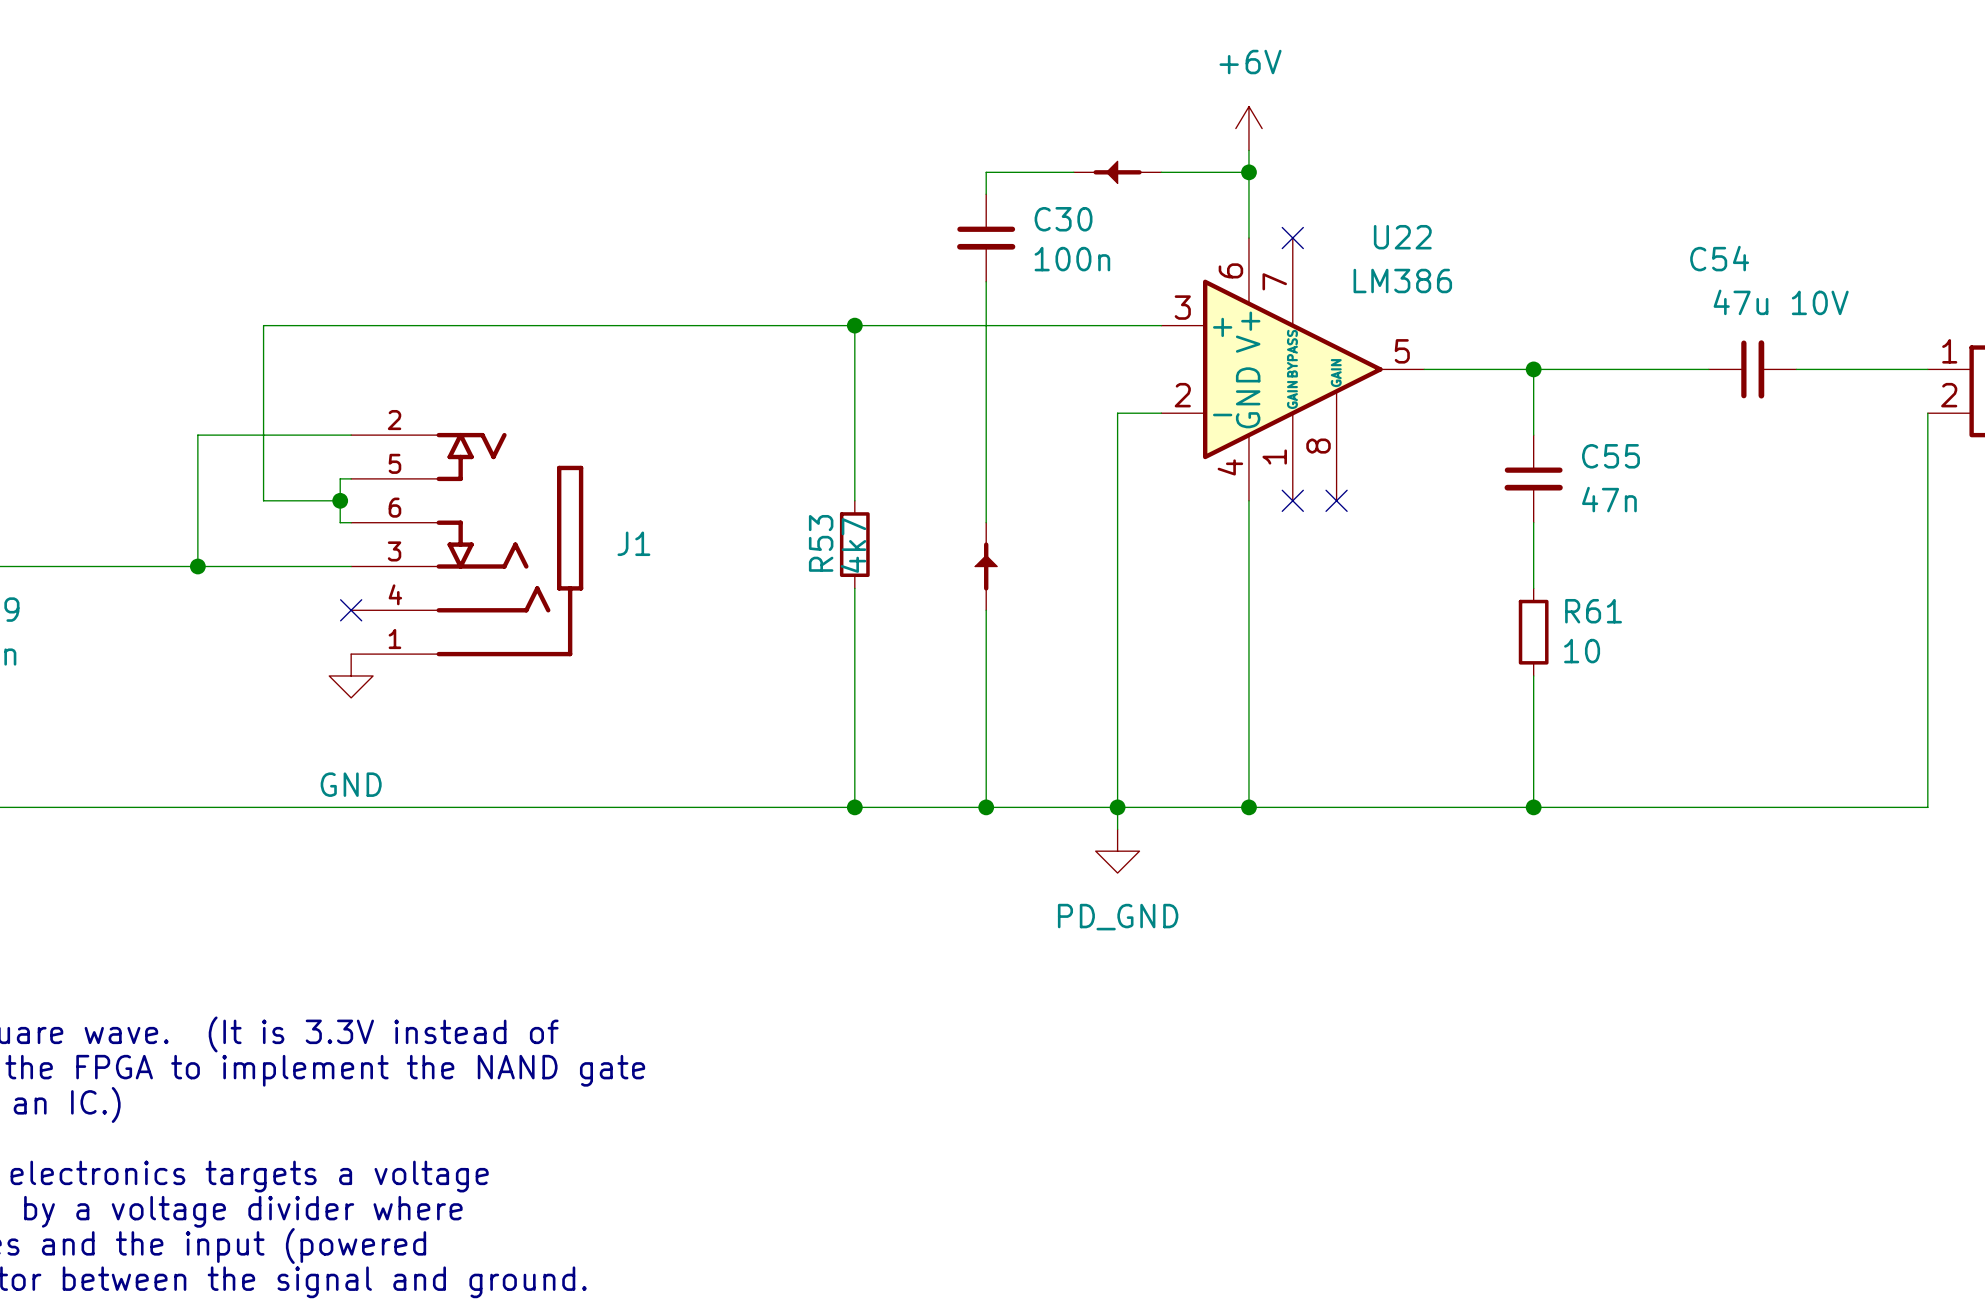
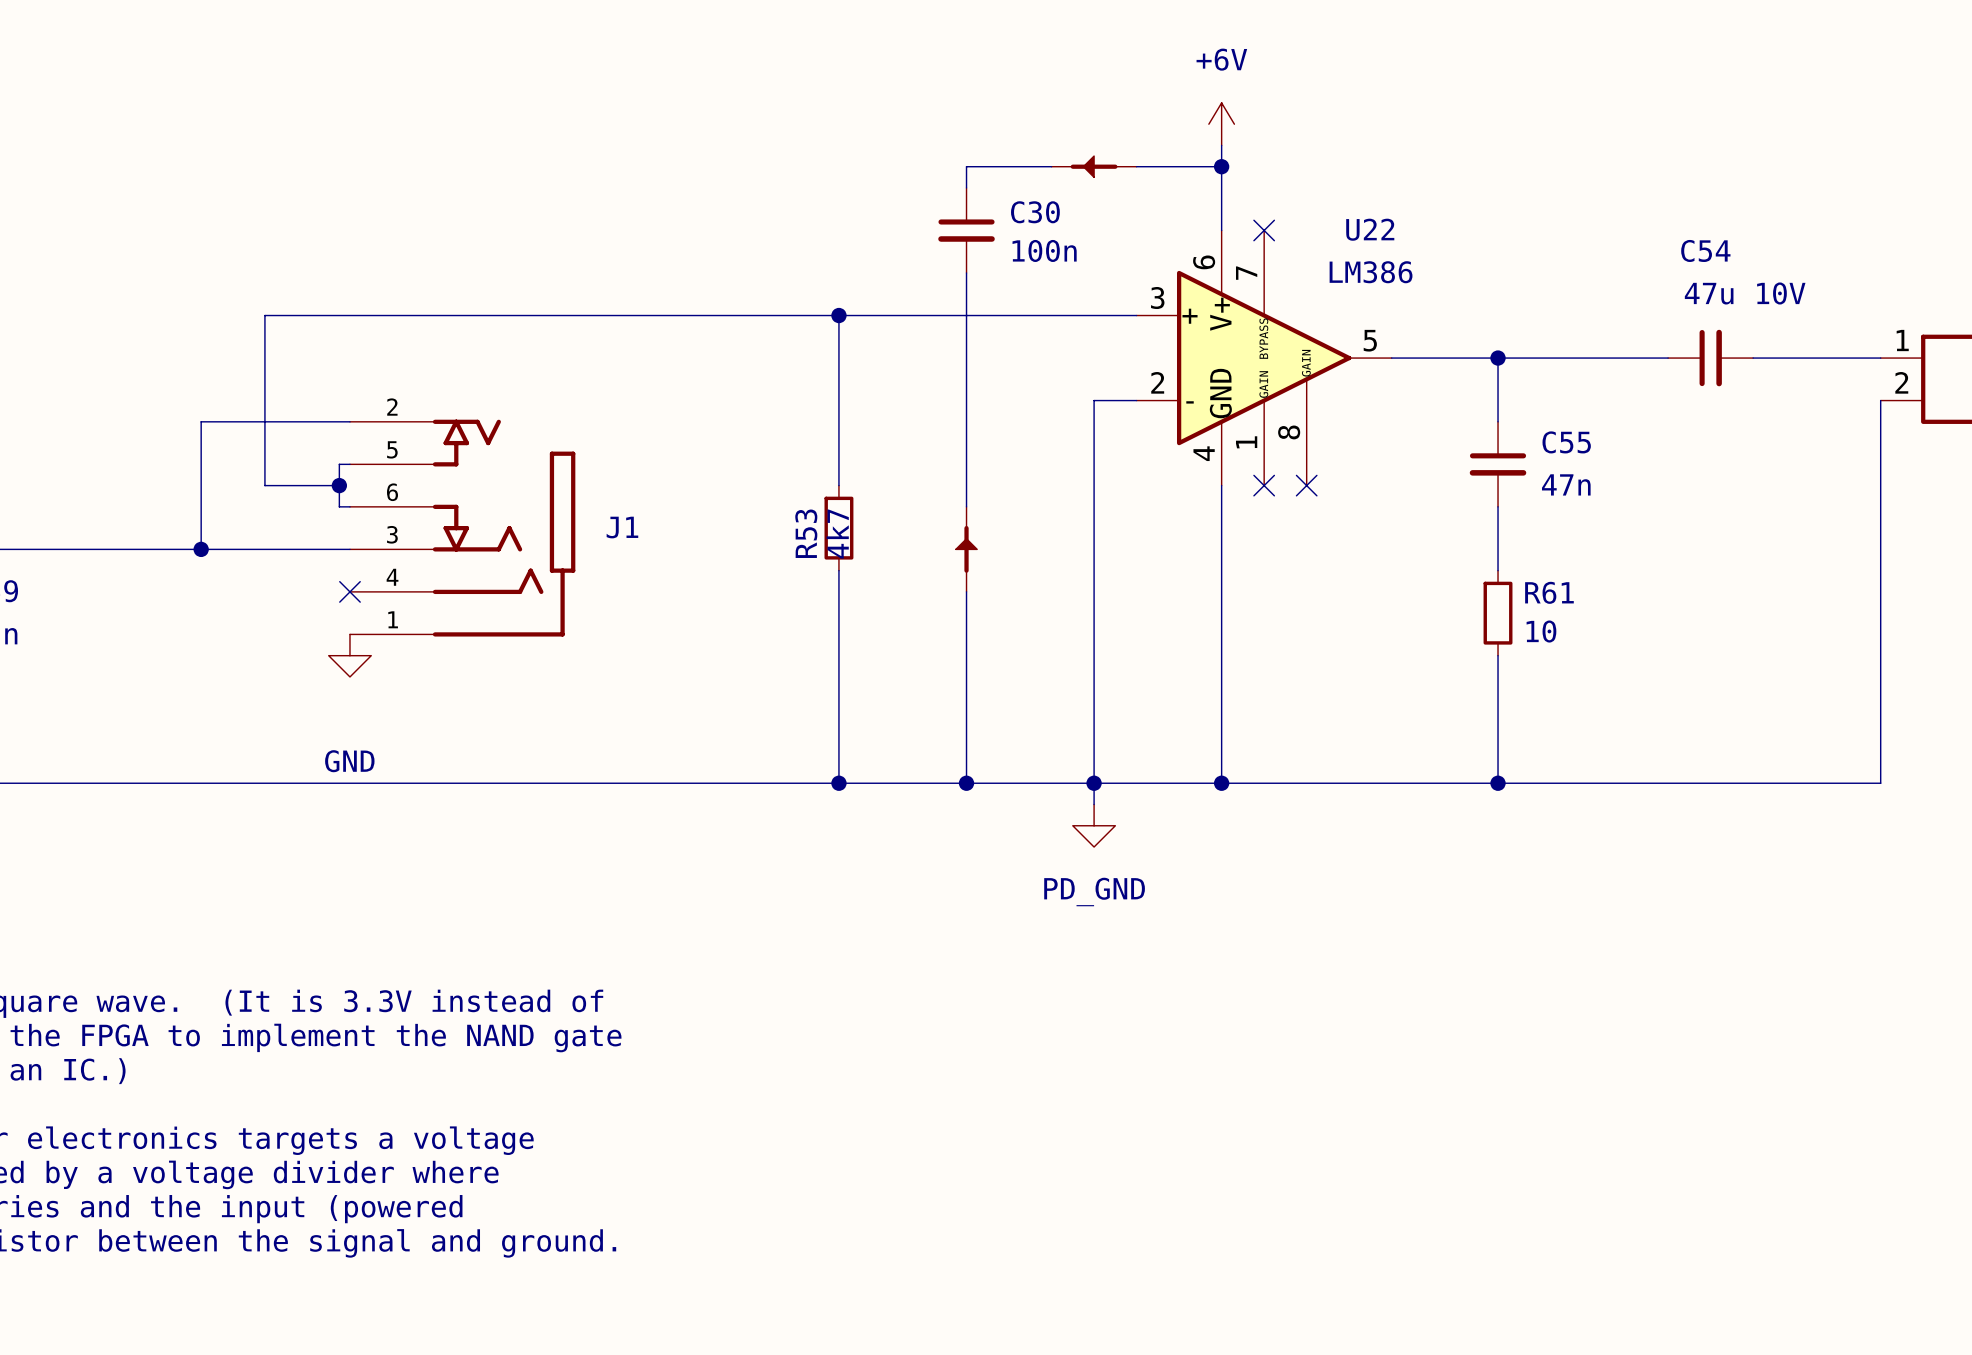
C54 name position: C54 (1719, 258) -> C54 (1705, 250)

